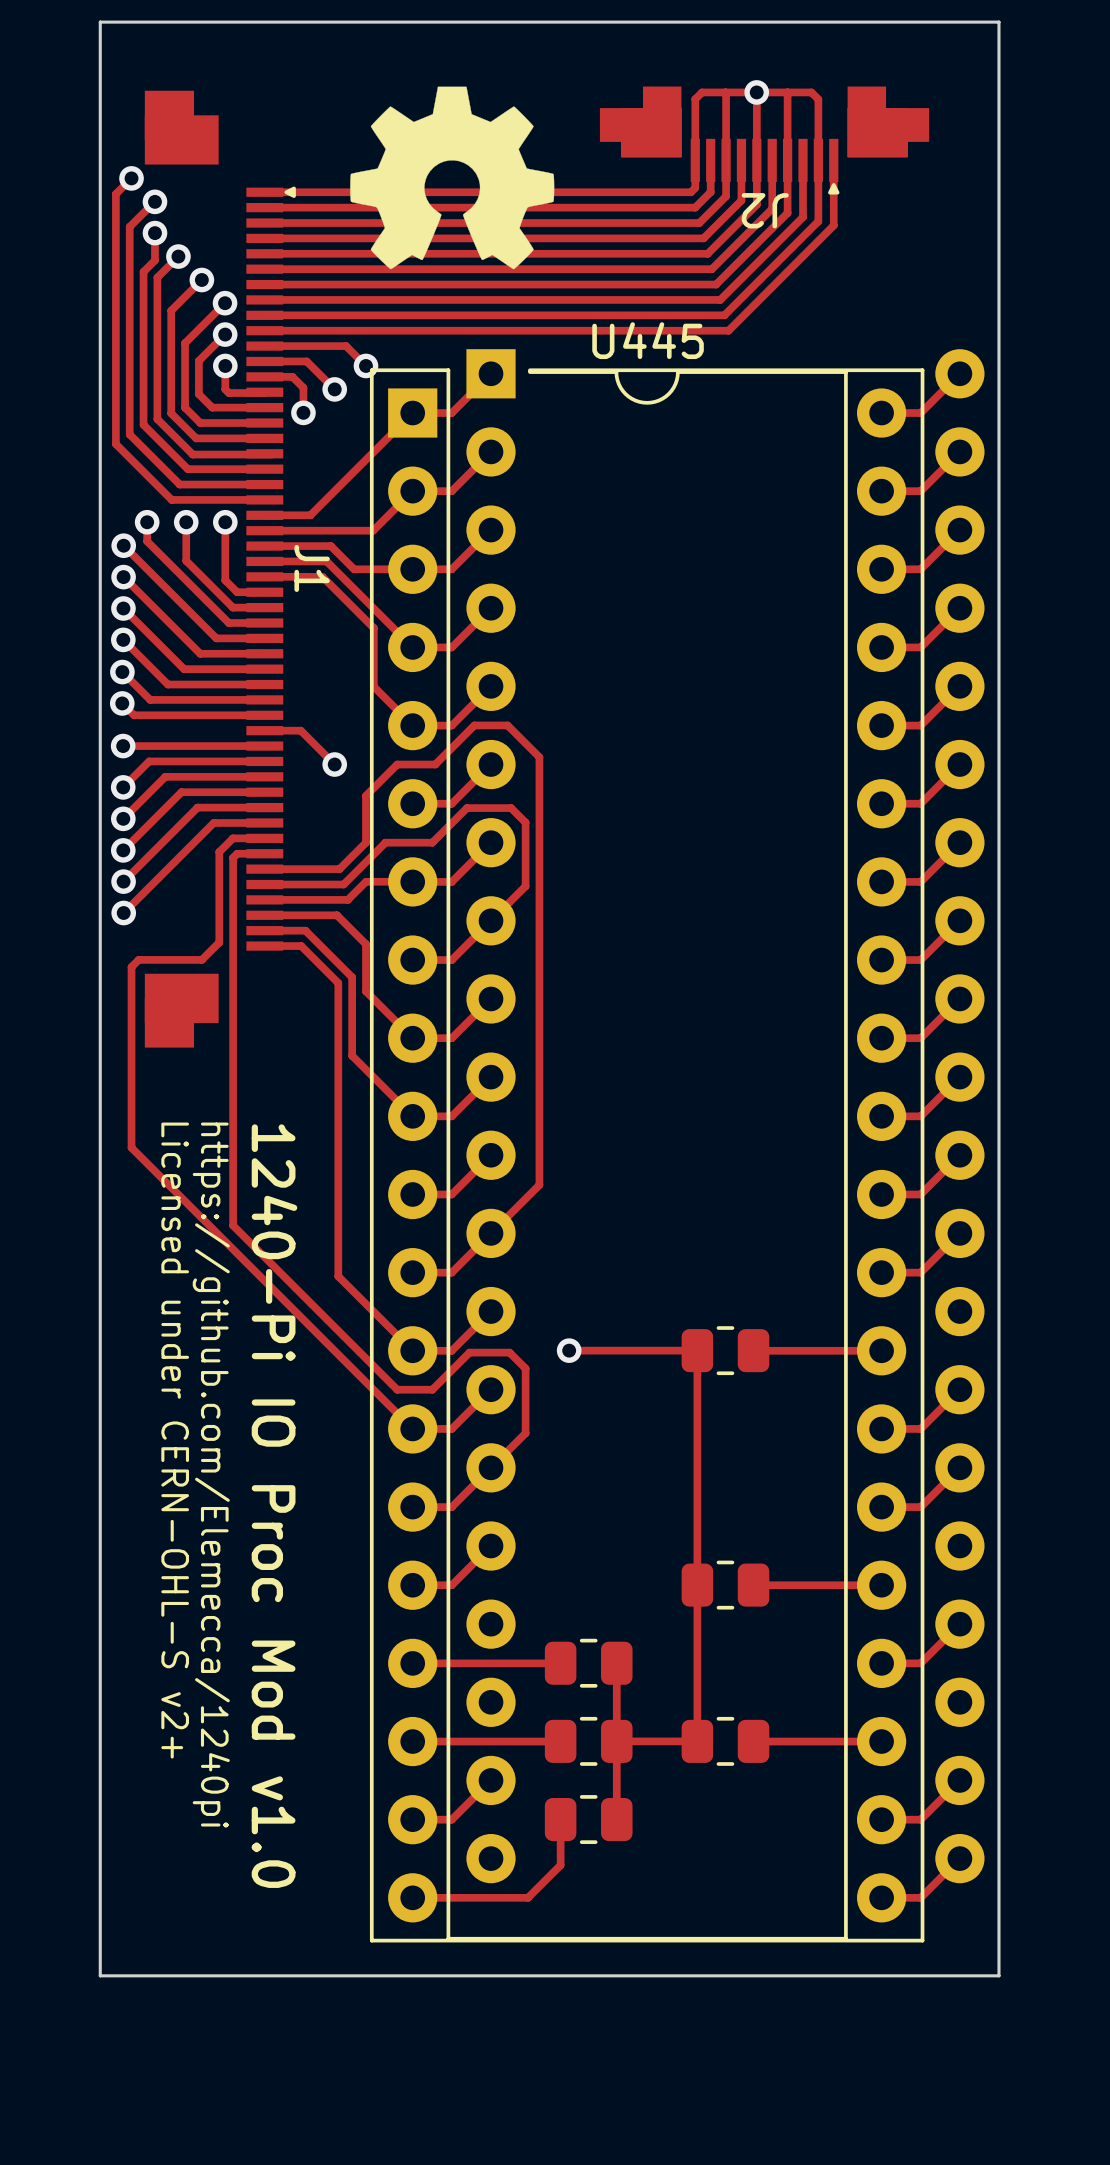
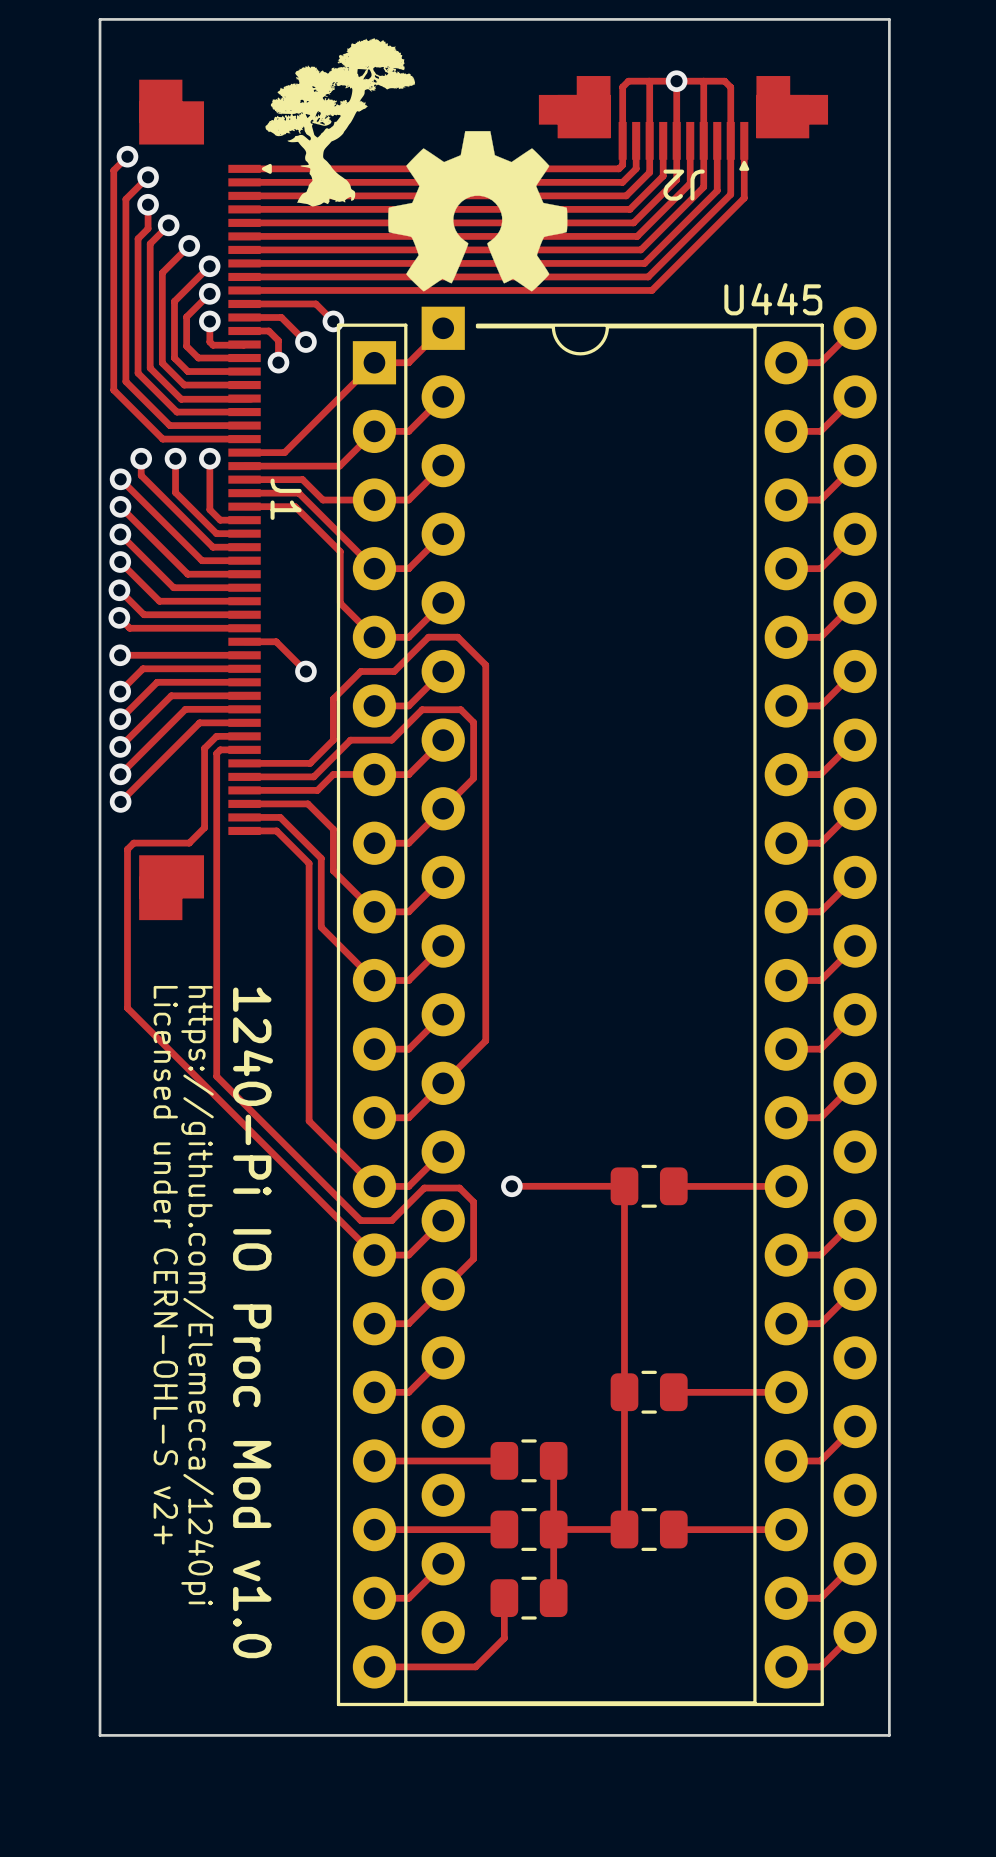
drawing: none -> [265, 38, 416, 207]
drawing position: (452, 177) -> (477, 211)
U445 name position: U445 (648, 340) -> U445 (773, 299)

